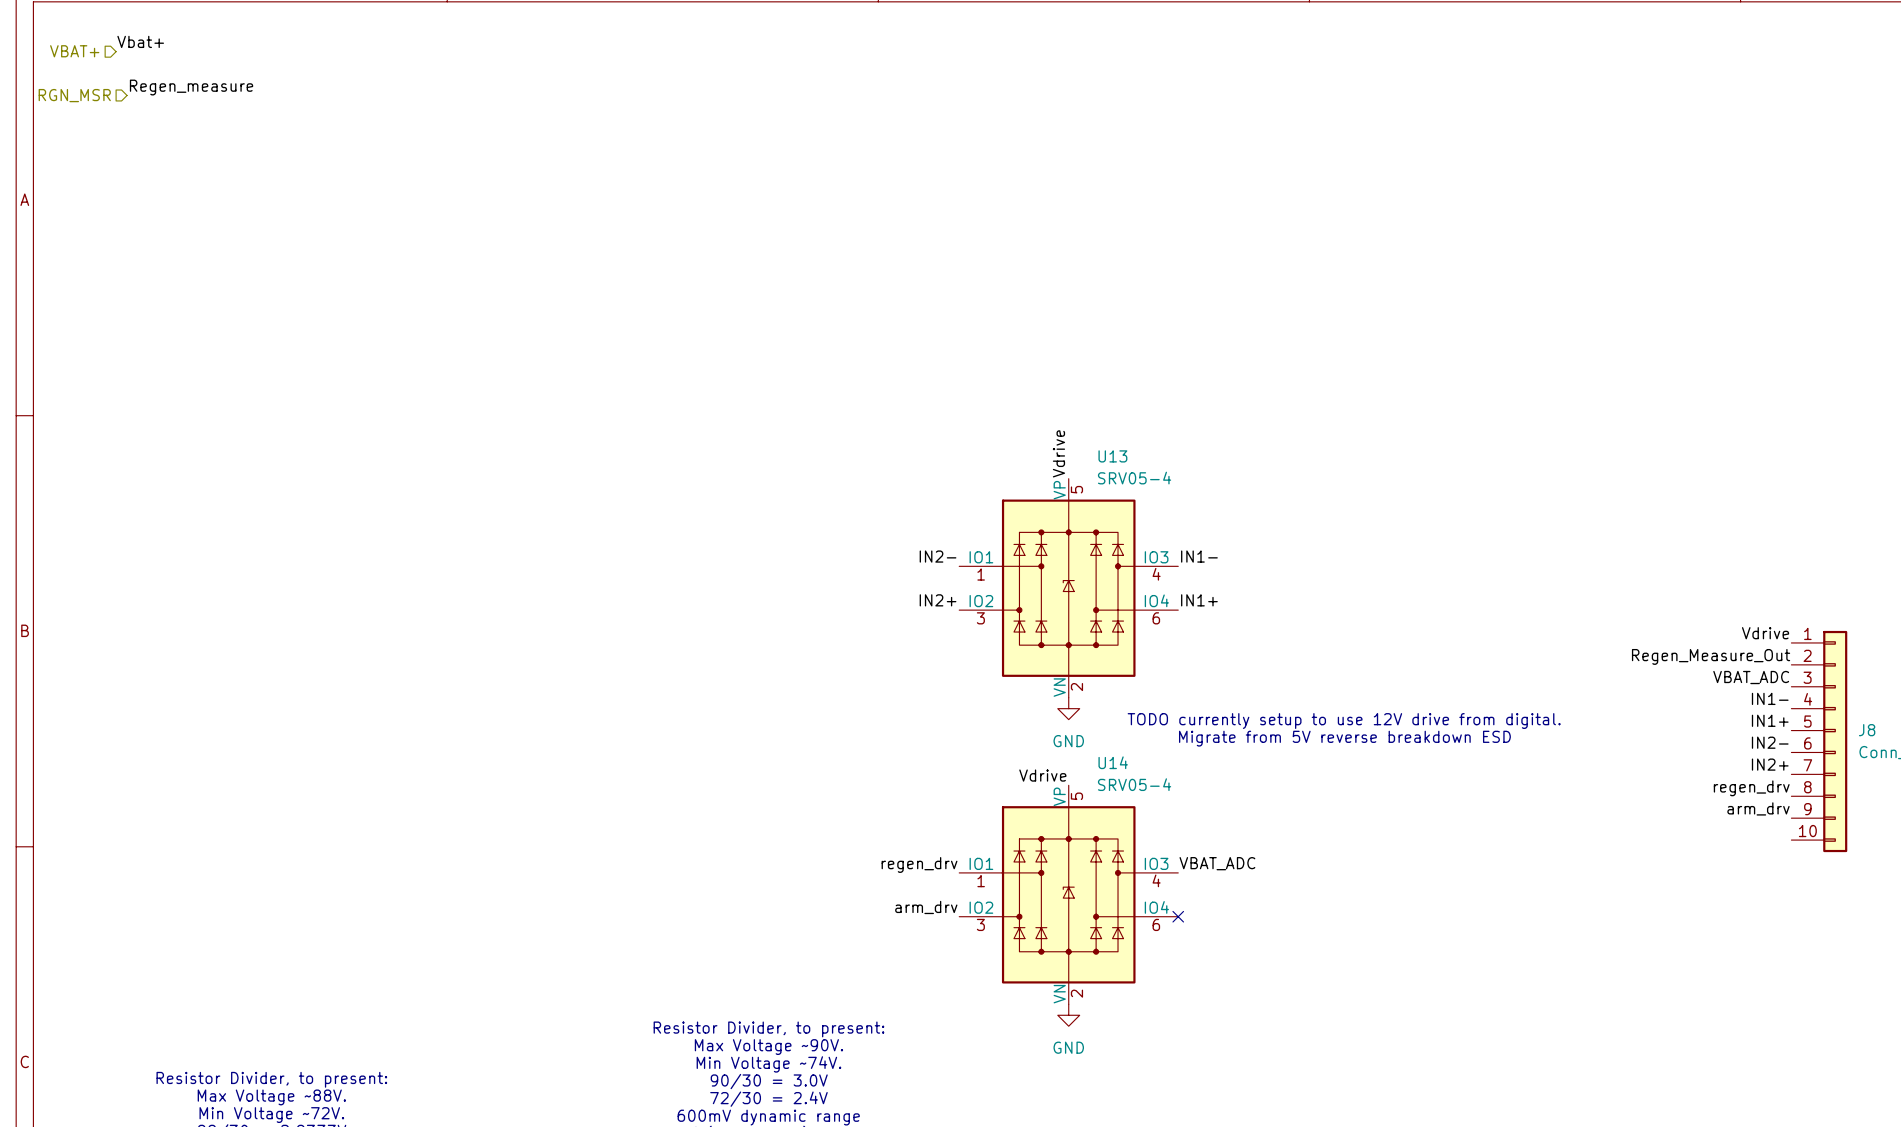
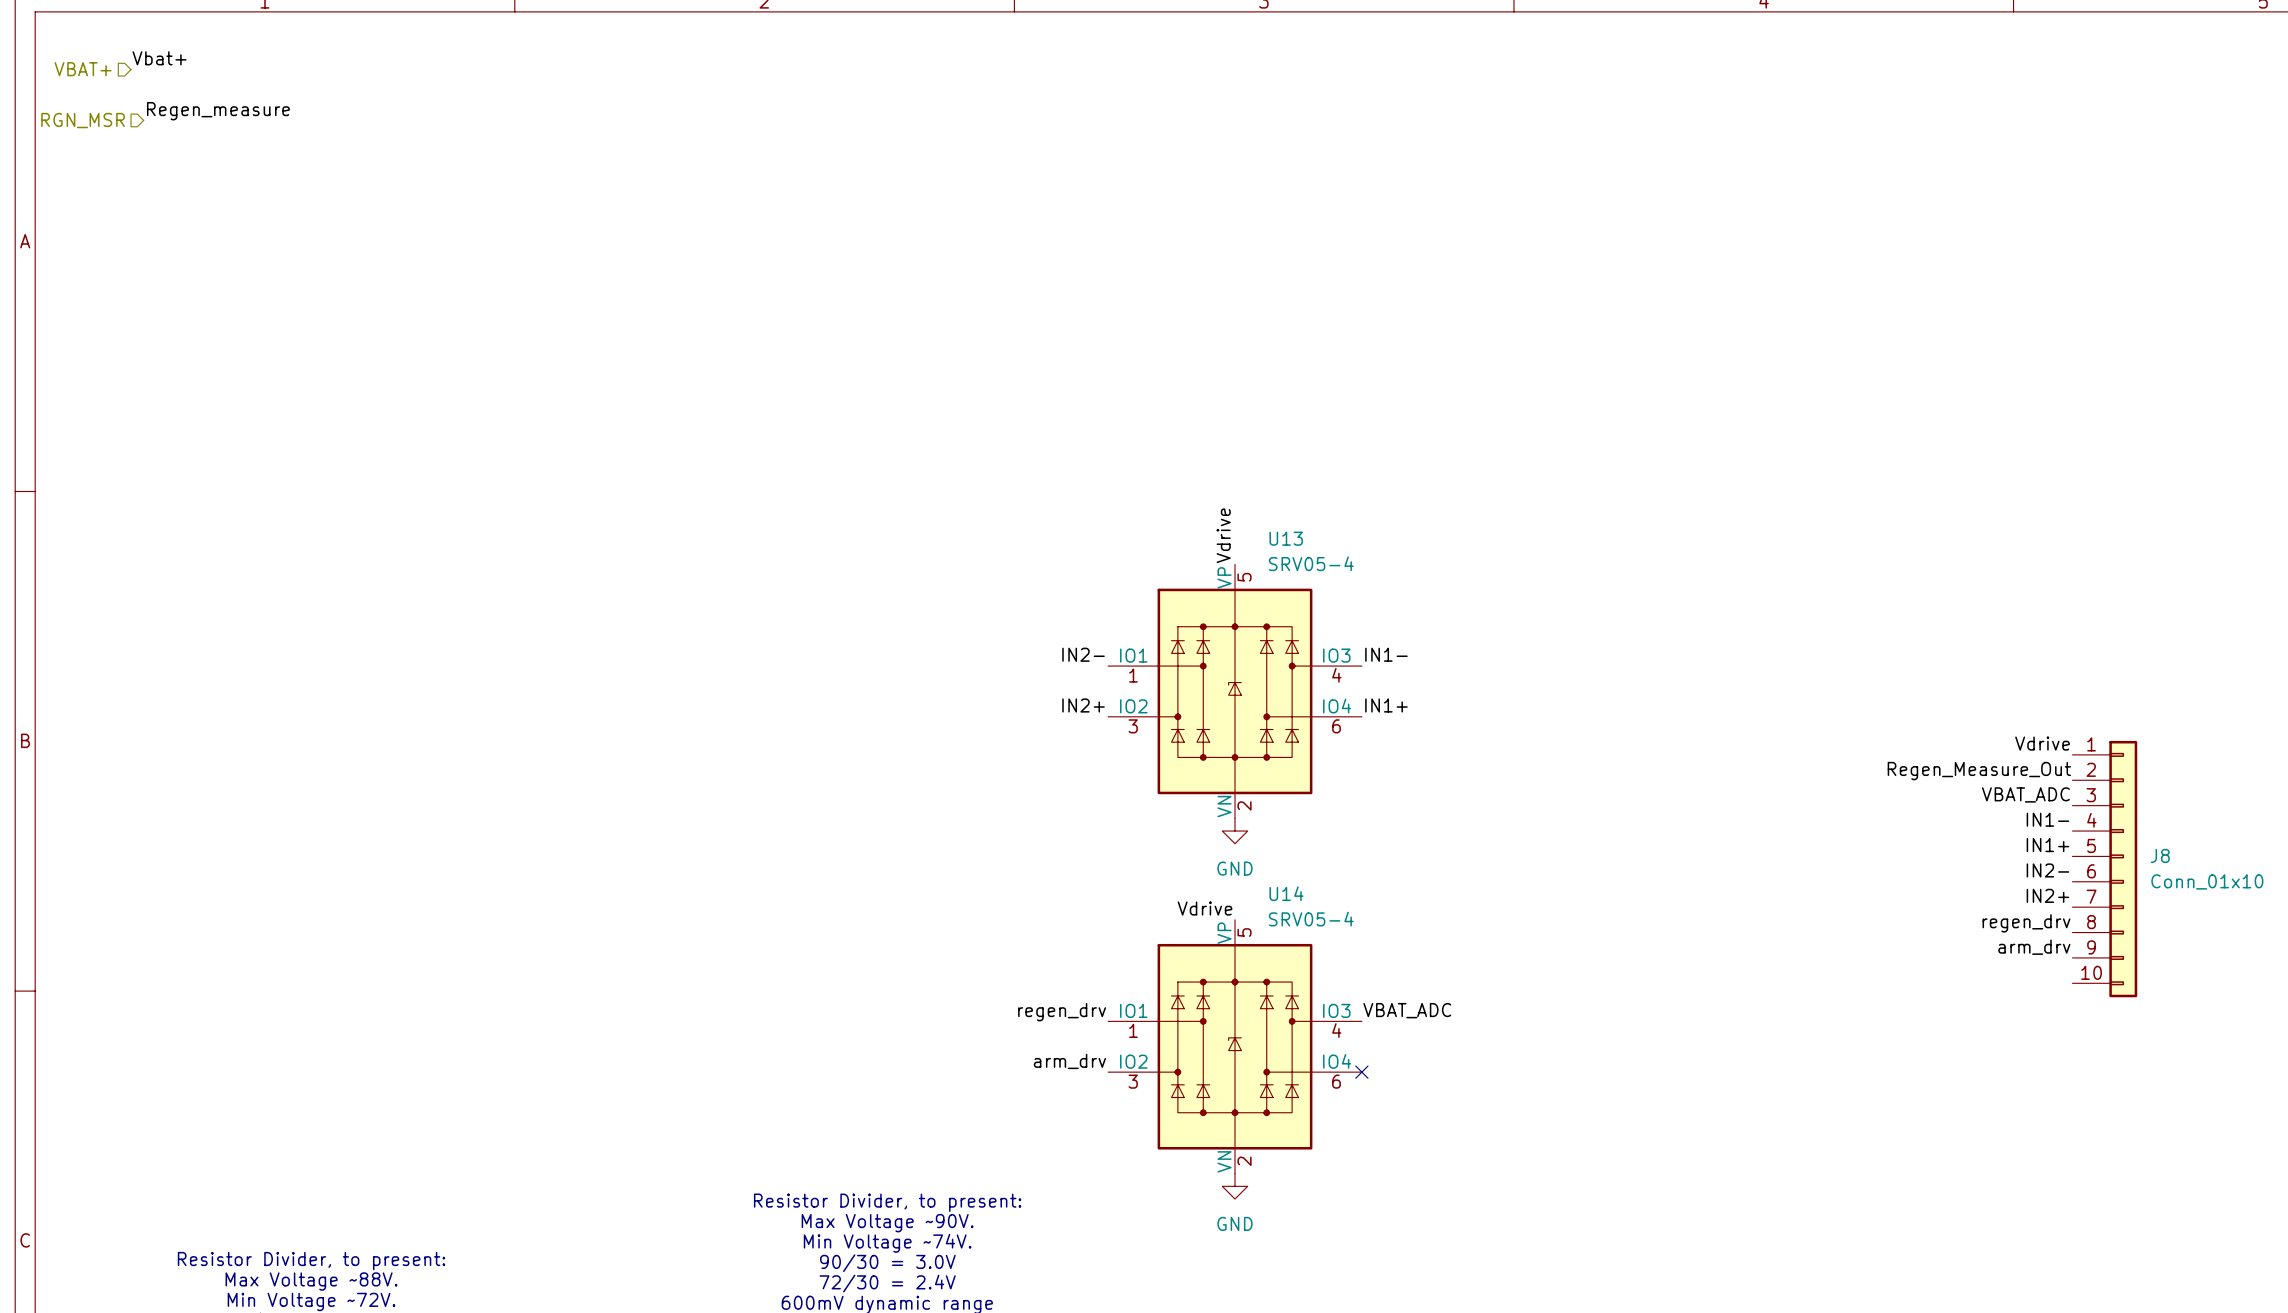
text: TODO currently setup to use 12V drive from digital. (1344, 721) -> none
text: Migrate from 5V reverse breakdown ESD (1344, 738) -> none

